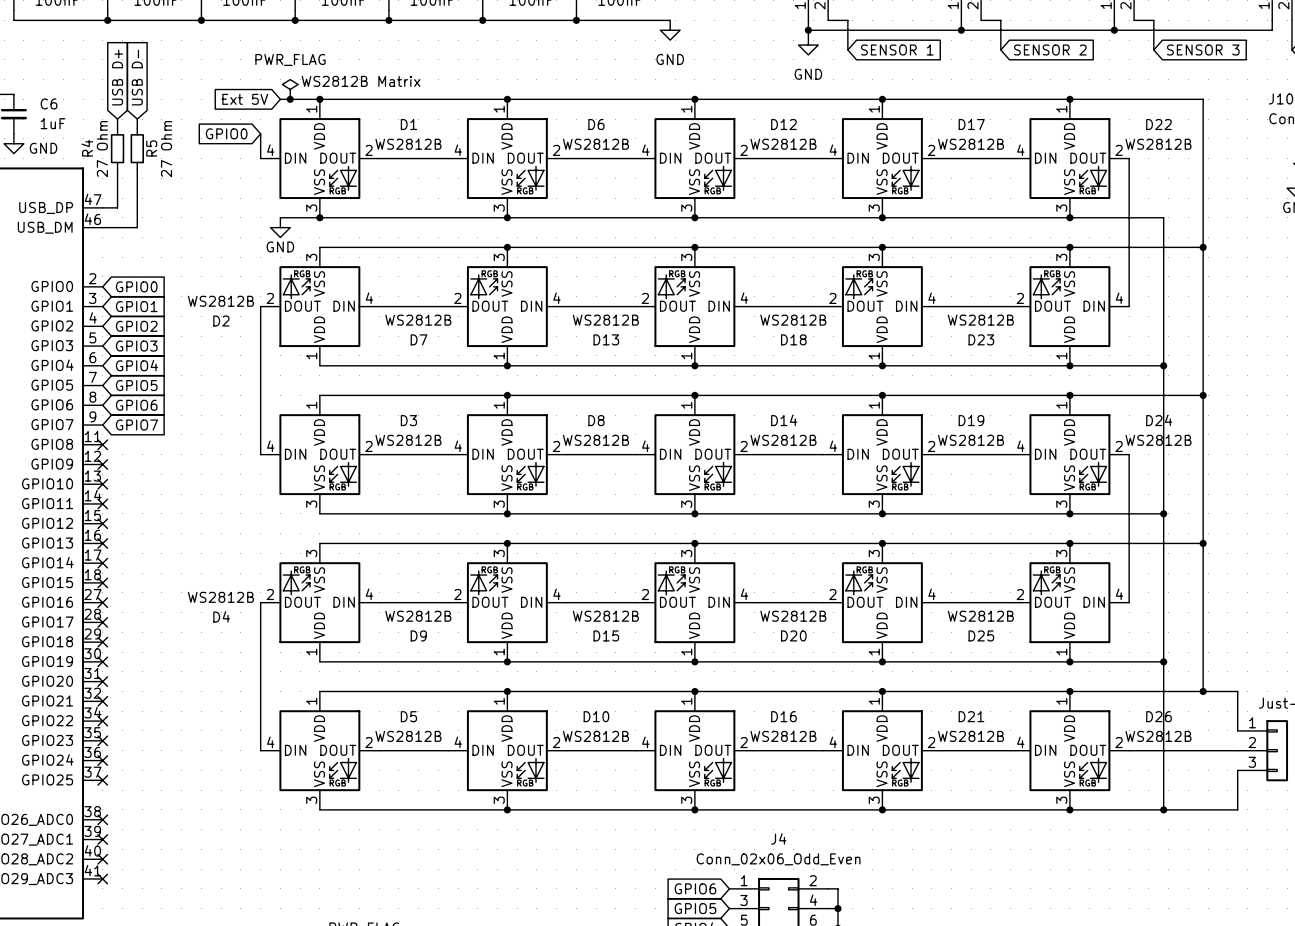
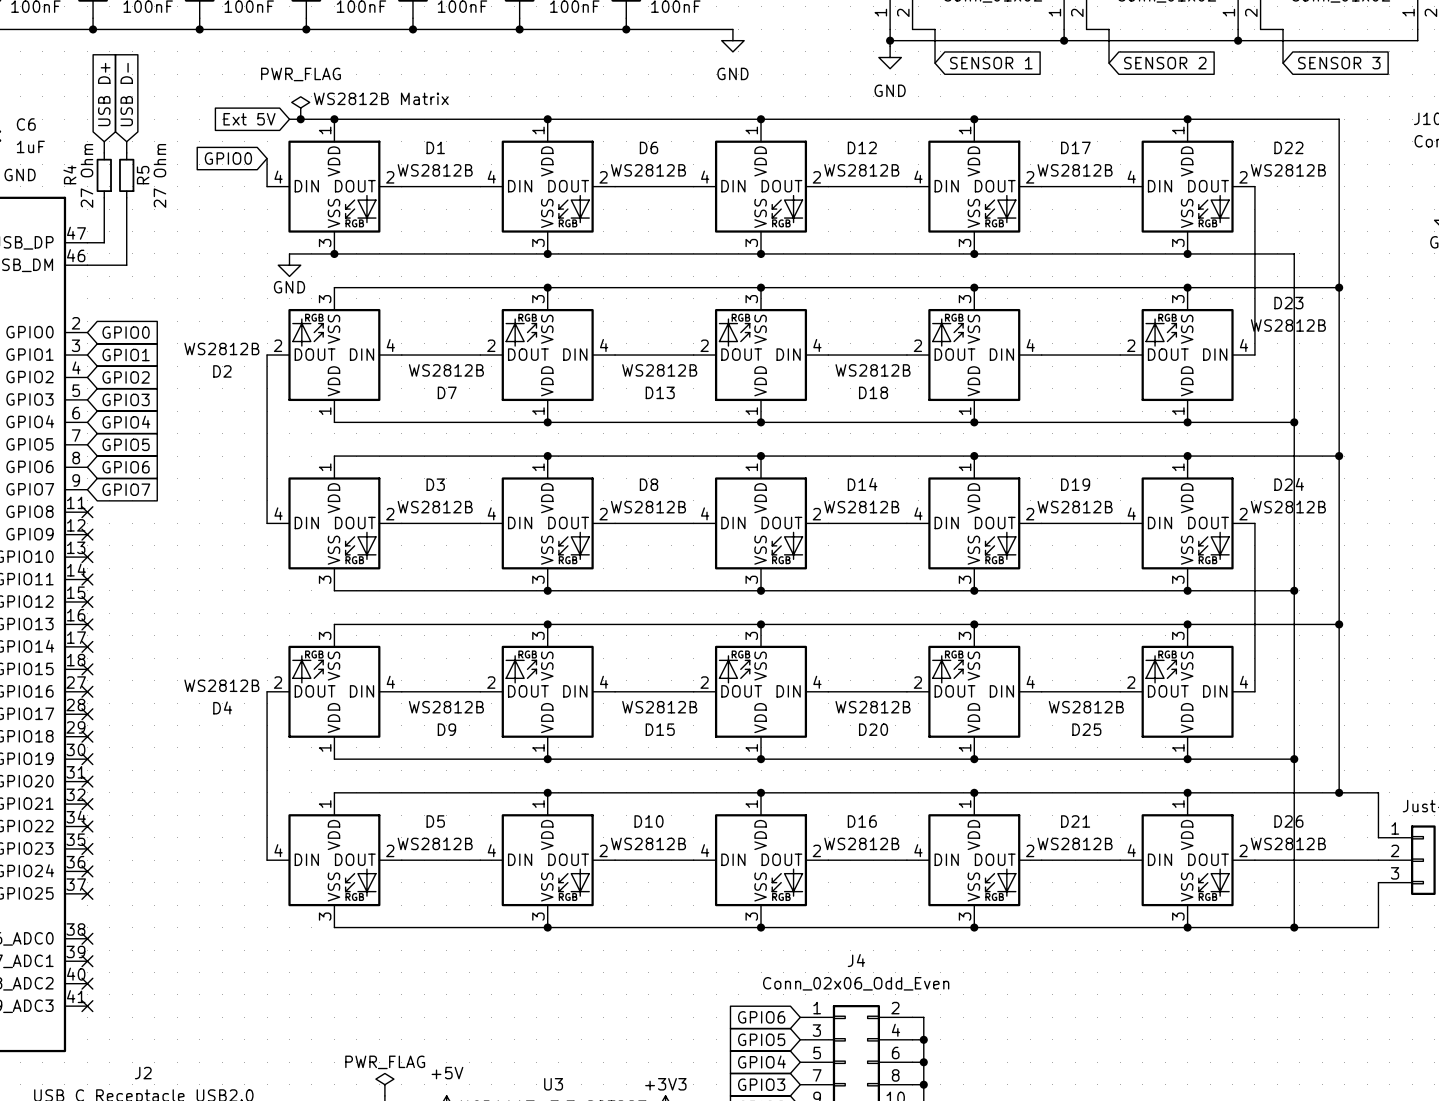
D23 value position: WS2812B (980, 320) -> WS2812B (1288, 325)
D23 name position: D23 (981, 339) -> D23 (1288, 303)

